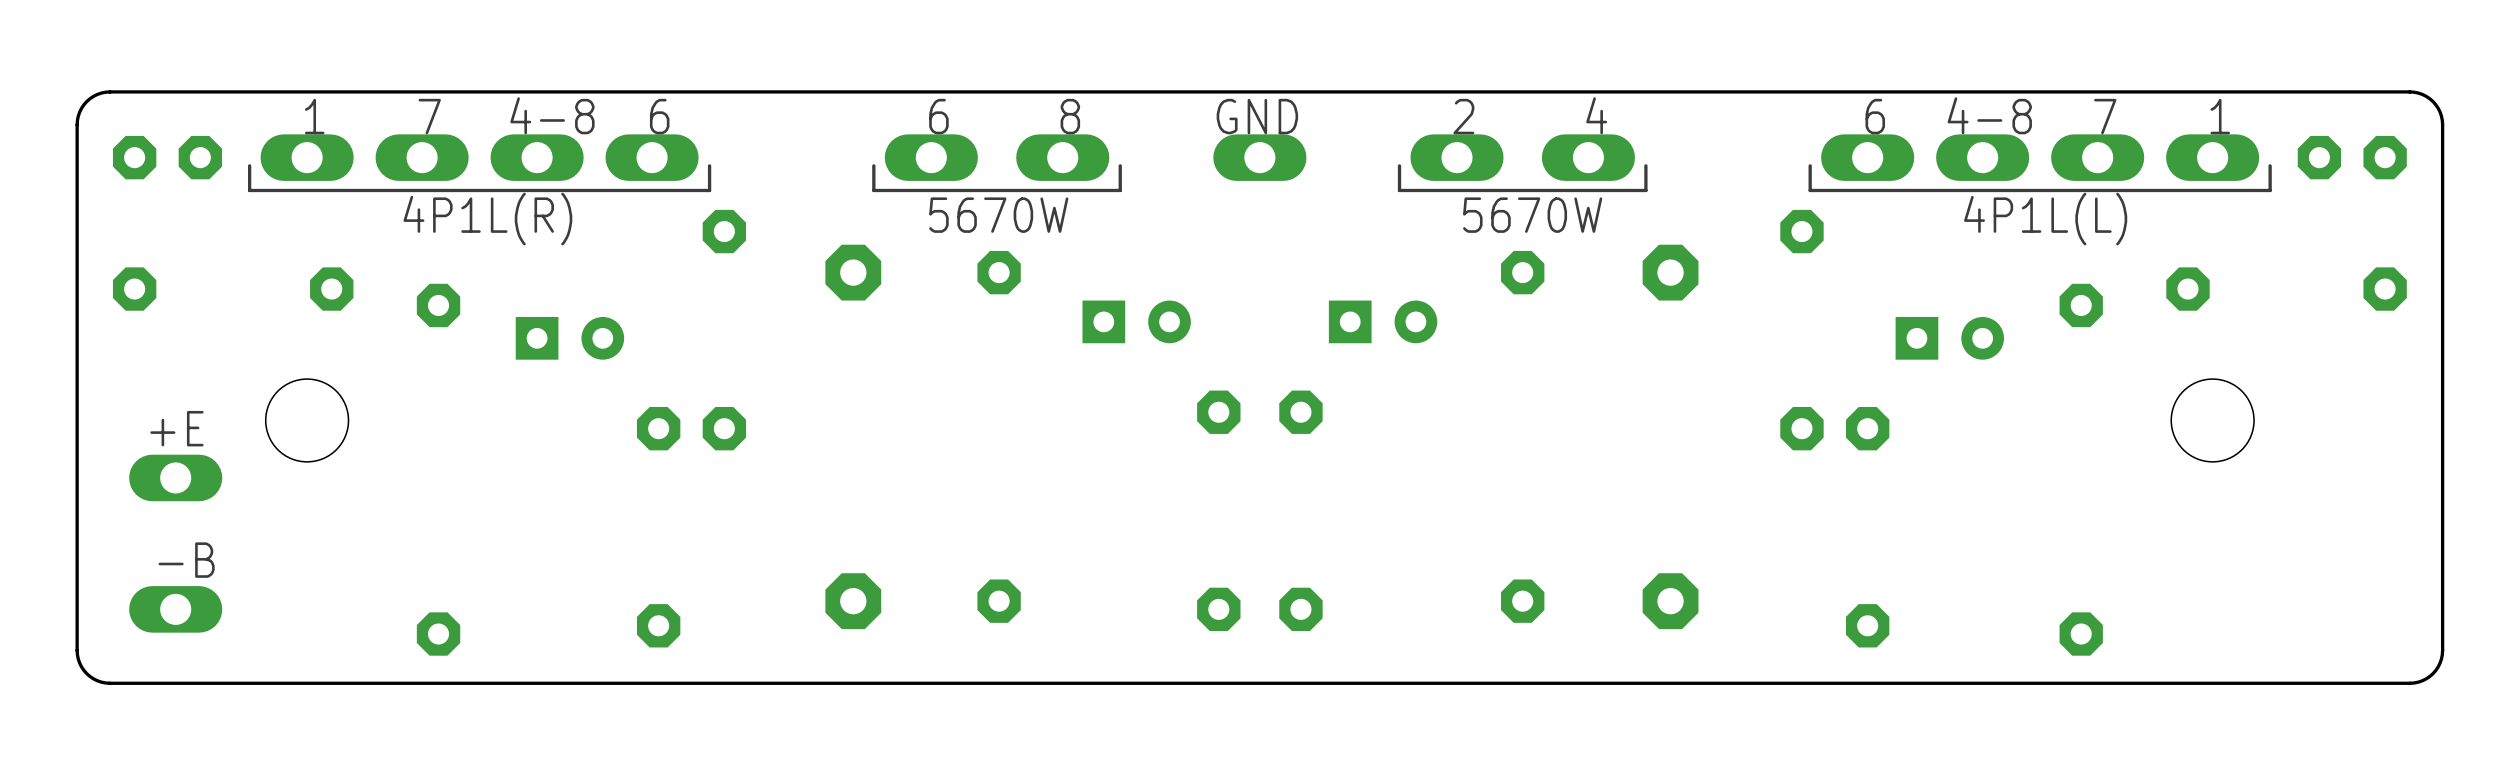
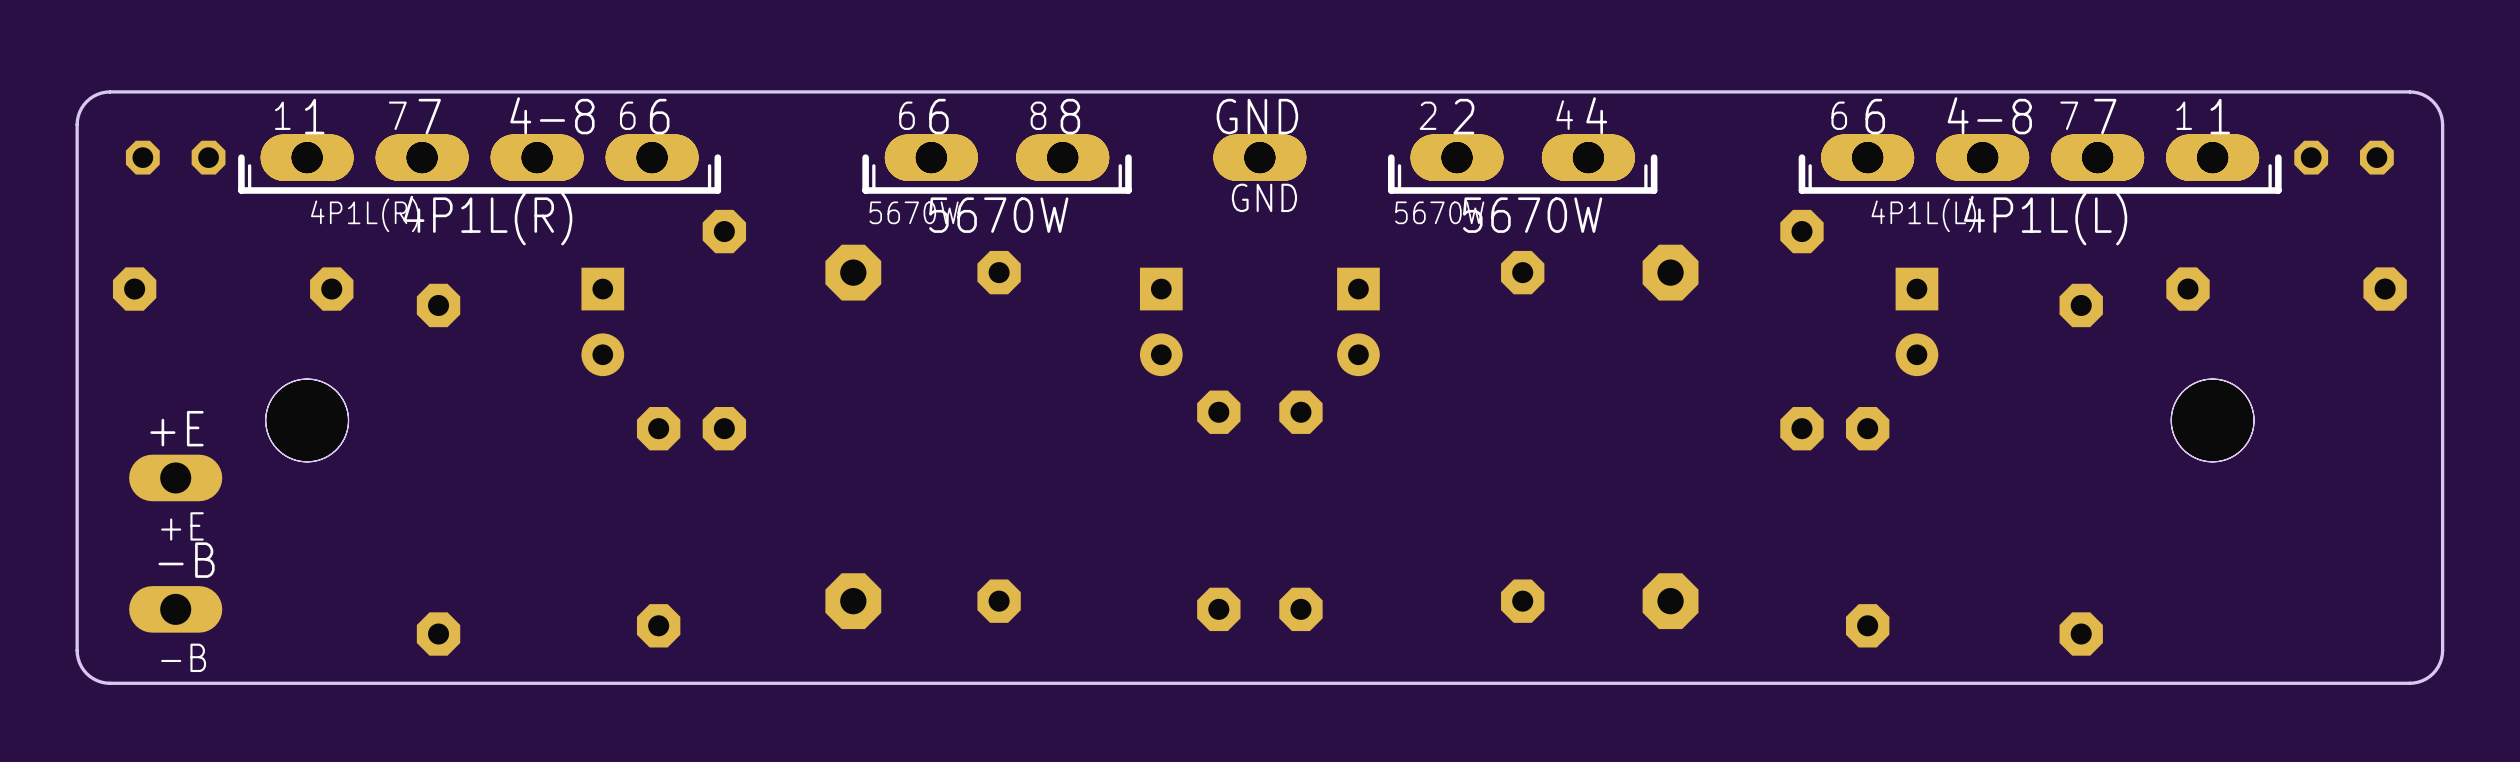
text: none -> 1 (282, 115)
text: none -> 7 (397, 115)
text: none -> 6 (627, 115)
text: none -> 6 (907, 115)
text: none -> 8 (1038, 115)
text: none -> 2 (1428, 115)
text: none -> 4 (1564, 115)
text: none -> 6 (1839, 115)
text: none -> 7 (2069, 115)
text: none -> 1 (2184, 115)
part footprint: [112, 135, 223, 180] -> [125, 140, 226, 175]
part footprint: [2297, 135, 2407, 180] -> [2294, 140, 2394, 175]
part: none -> (307, 157)
part: none -> (422, 157)
part: none -> (537, 157)
part: none -> (652, 157)
line: none -> (717, 157) (717, 190) (241, 190) (241, 157)
part: none -> (931, 157)
part: none -> (1062, 157)
line: none -> (1128, 157) (1128, 190) (865, 190) (865, 157)
part: none -> (1259, 157)
part: none -> (1457, 157)
part: none -> (1588, 157)
line: none -> (1654, 157) (1654, 190) (1391, 190) (1391, 157)
part: none -> (1867, 157)
part: none -> (1982, 157)
part: none -> (2097, 157)
part: none -> (2212, 157)
line: none -> (2278, 157) (2278, 190) (1801, 190) (1801, 157)
text: none -> GND (1264, 197)
text: none -> 5670W (914, 212)
text: none -> 5670W (1439, 212)
text: none -> 4P1L(R) (364, 215)
text: none -> 4P1L(L) (1923, 215)
part rotation: 0° (1136, 321) -> 90° clockwise (1161, 321)
part rotation: 0° (1383, 321) -> 90° clockwise (1358, 321)
part rotation: 0° (569, 338) -> 90° clockwise (602, 321)
part rotation: 0° (1949, 338) -> 90° clockwise (1916, 321)
hole: none -> (307, 420)
hole: none -> (2212, 420)
text: none -> +E (182, 526)
text: none -> -B (183, 657)

